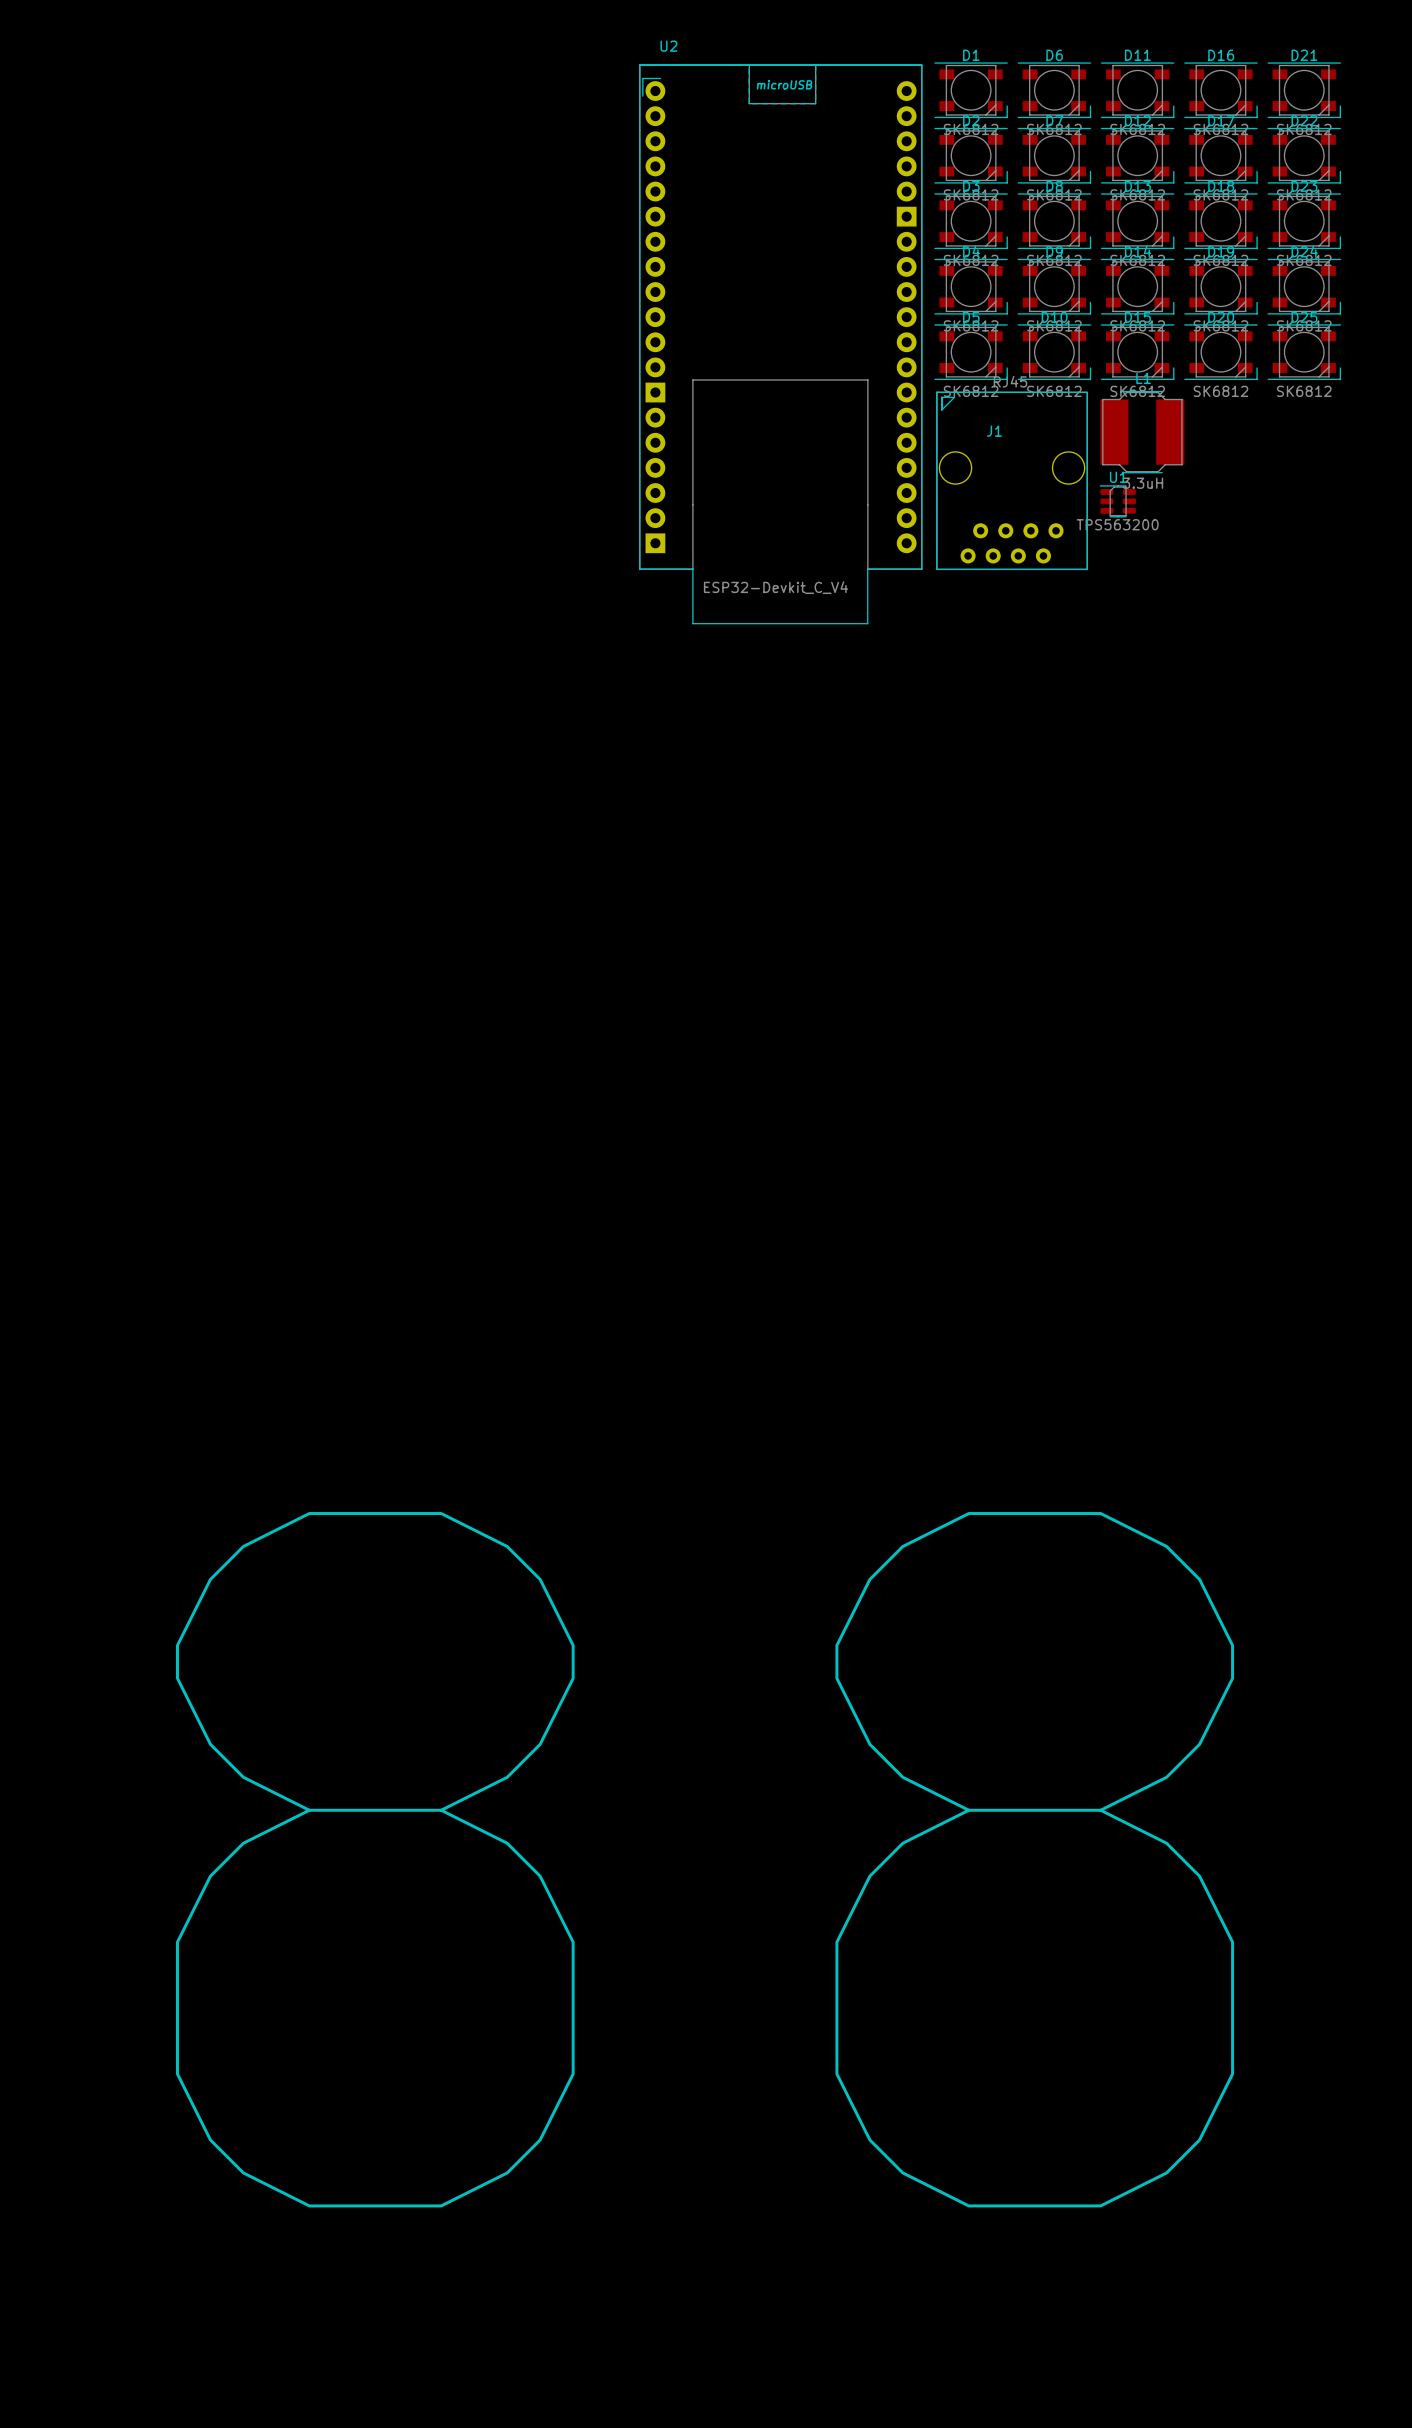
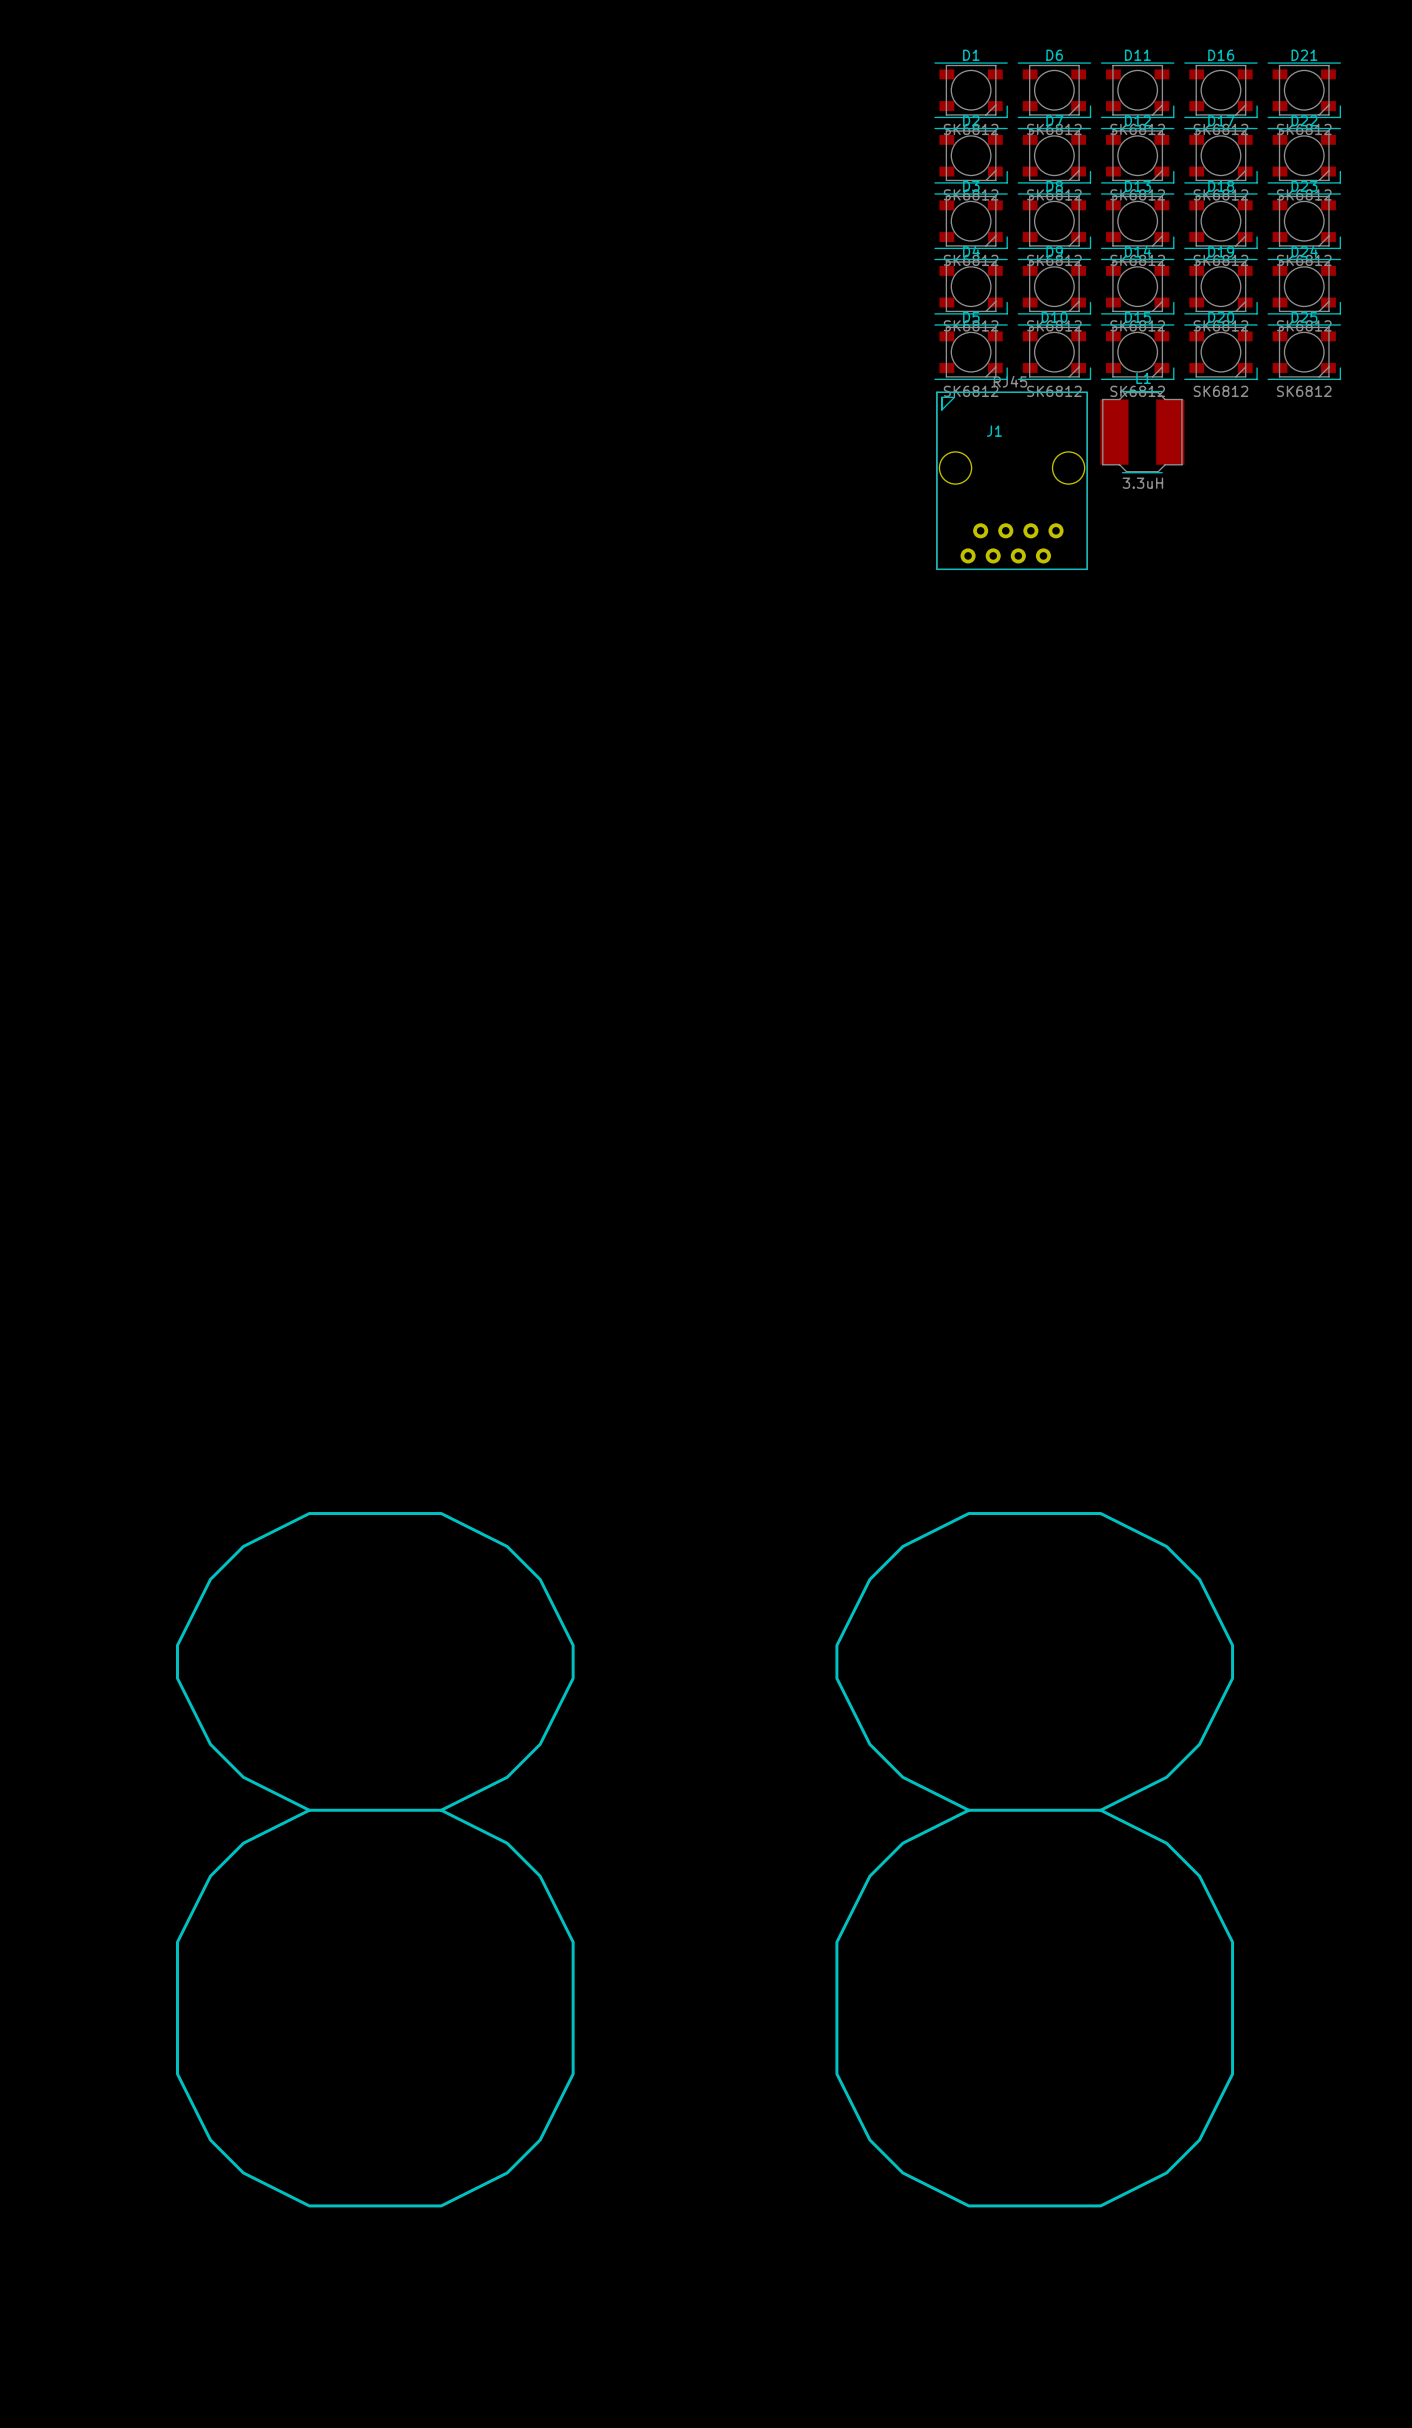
U2: ESP32-Devkit_C_V4 (780, 344) -> none
U1: TPS563200 (1117, 501) -> none

